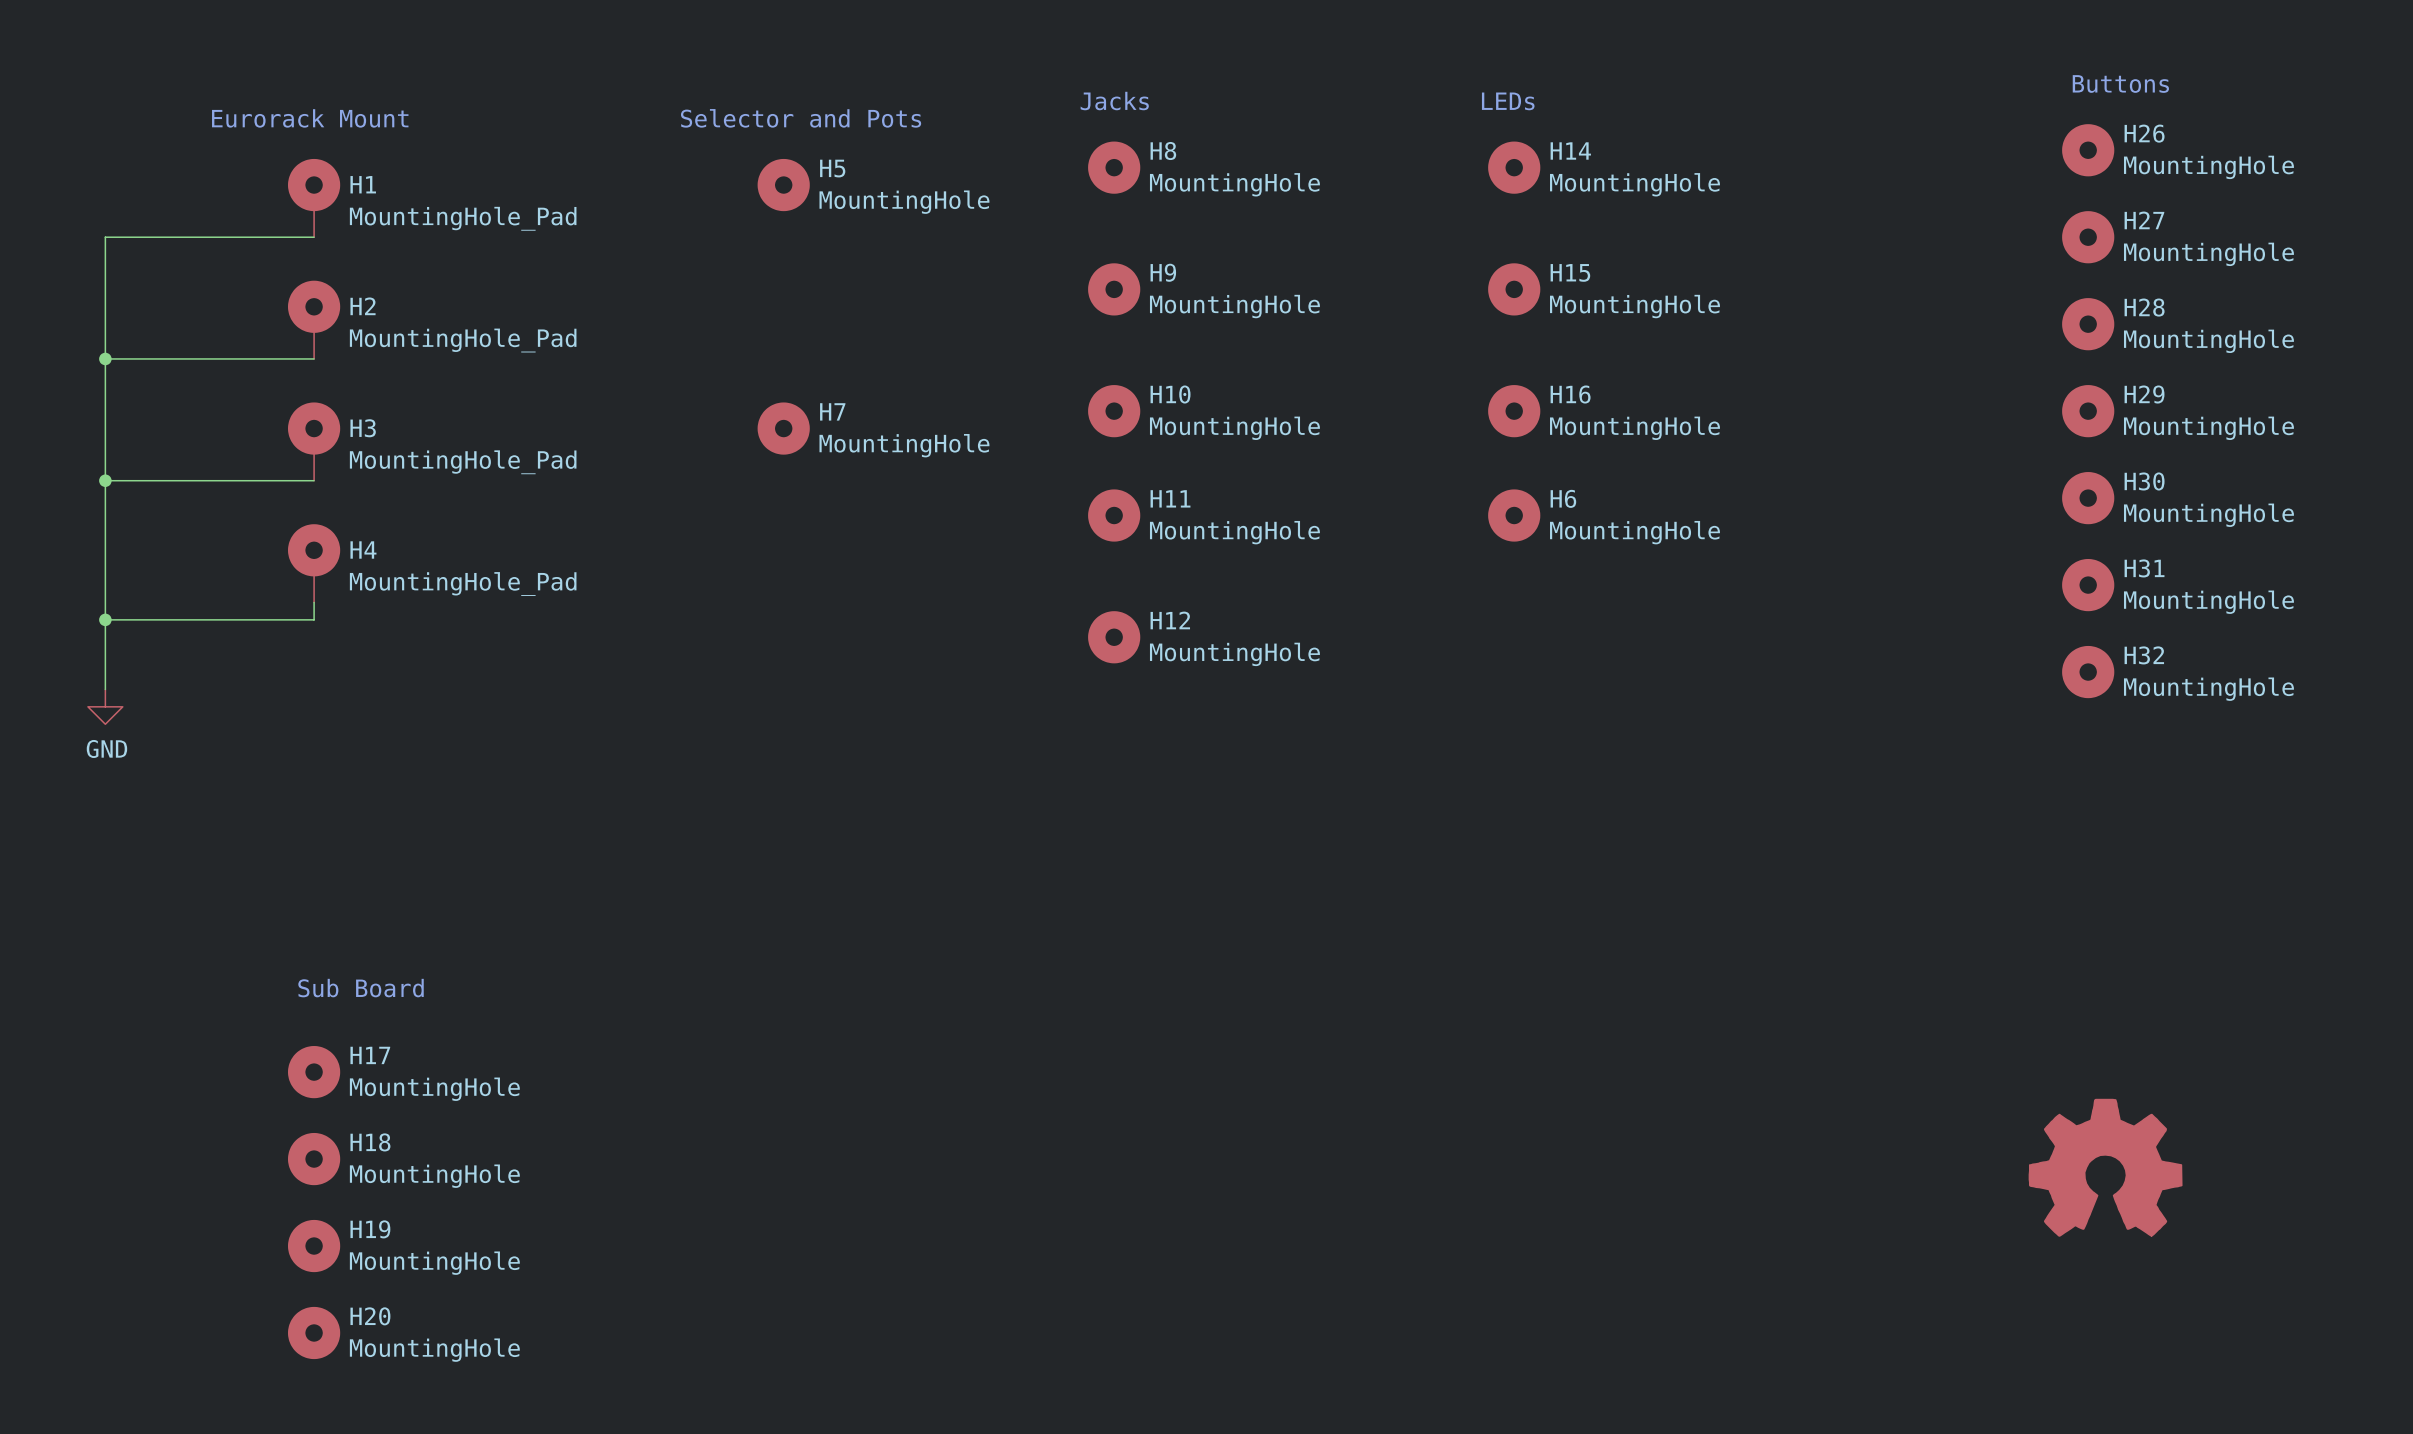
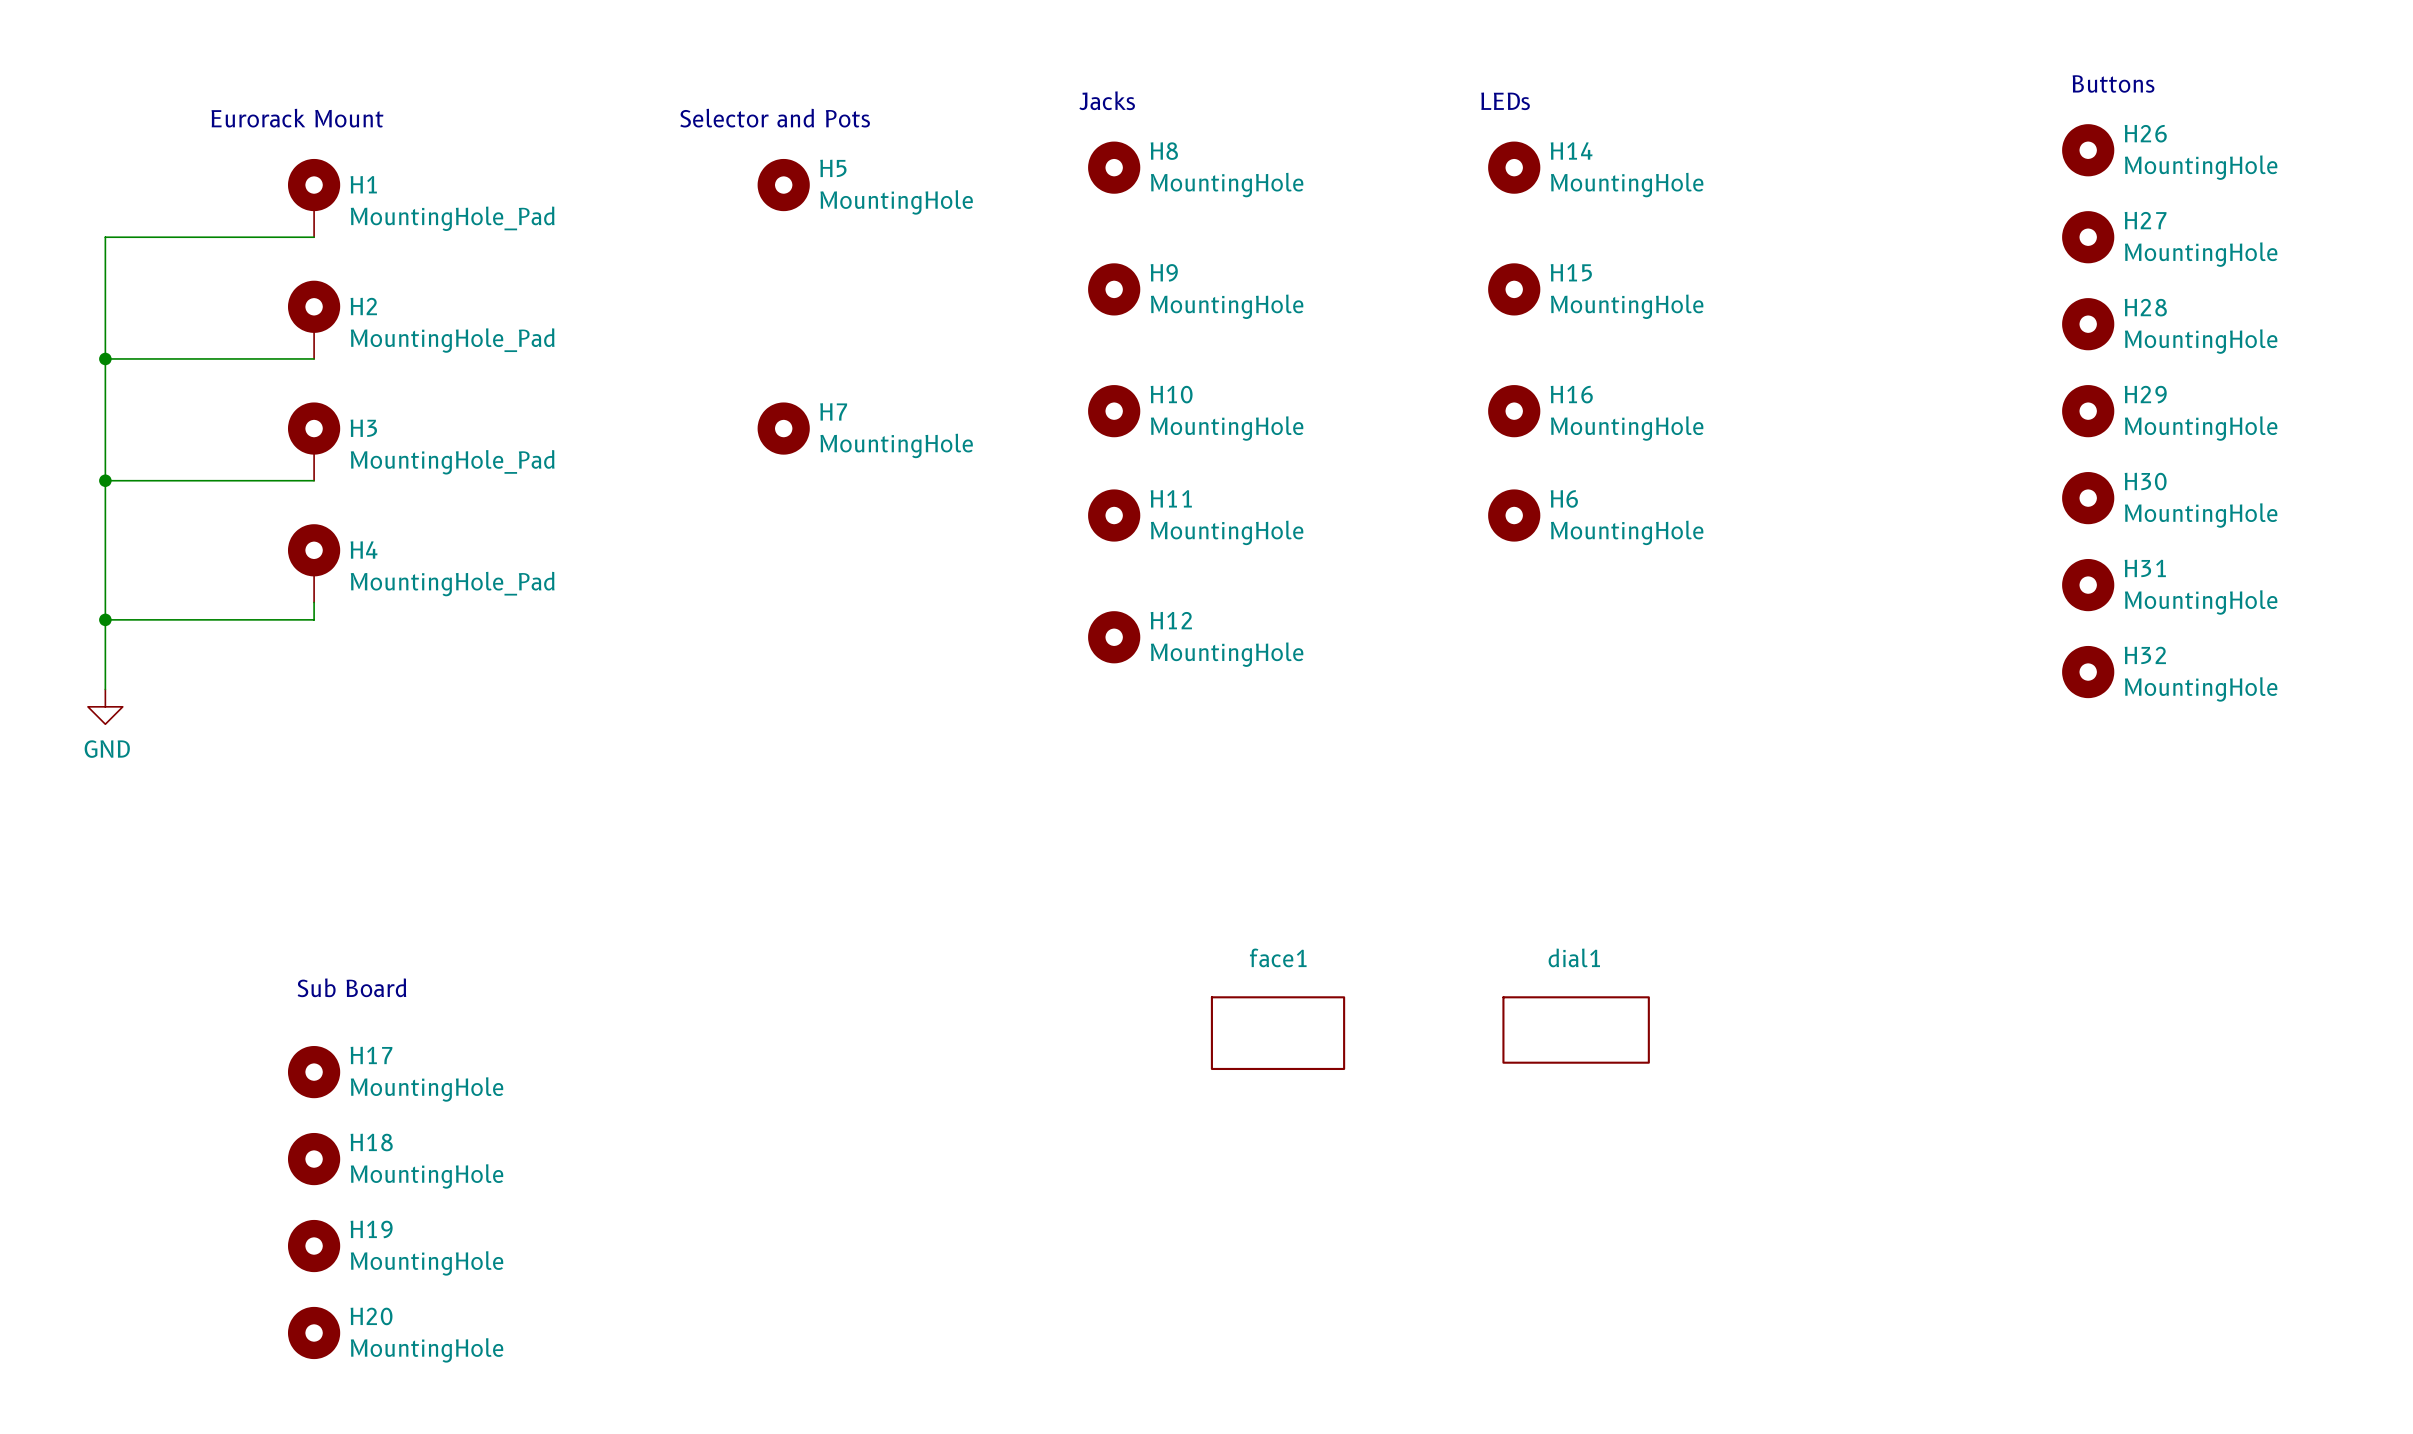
dial1: none -> (1576, 1030)
face1: none -> (1278, 1033)
power symbol: (2105, 1167) -> none

